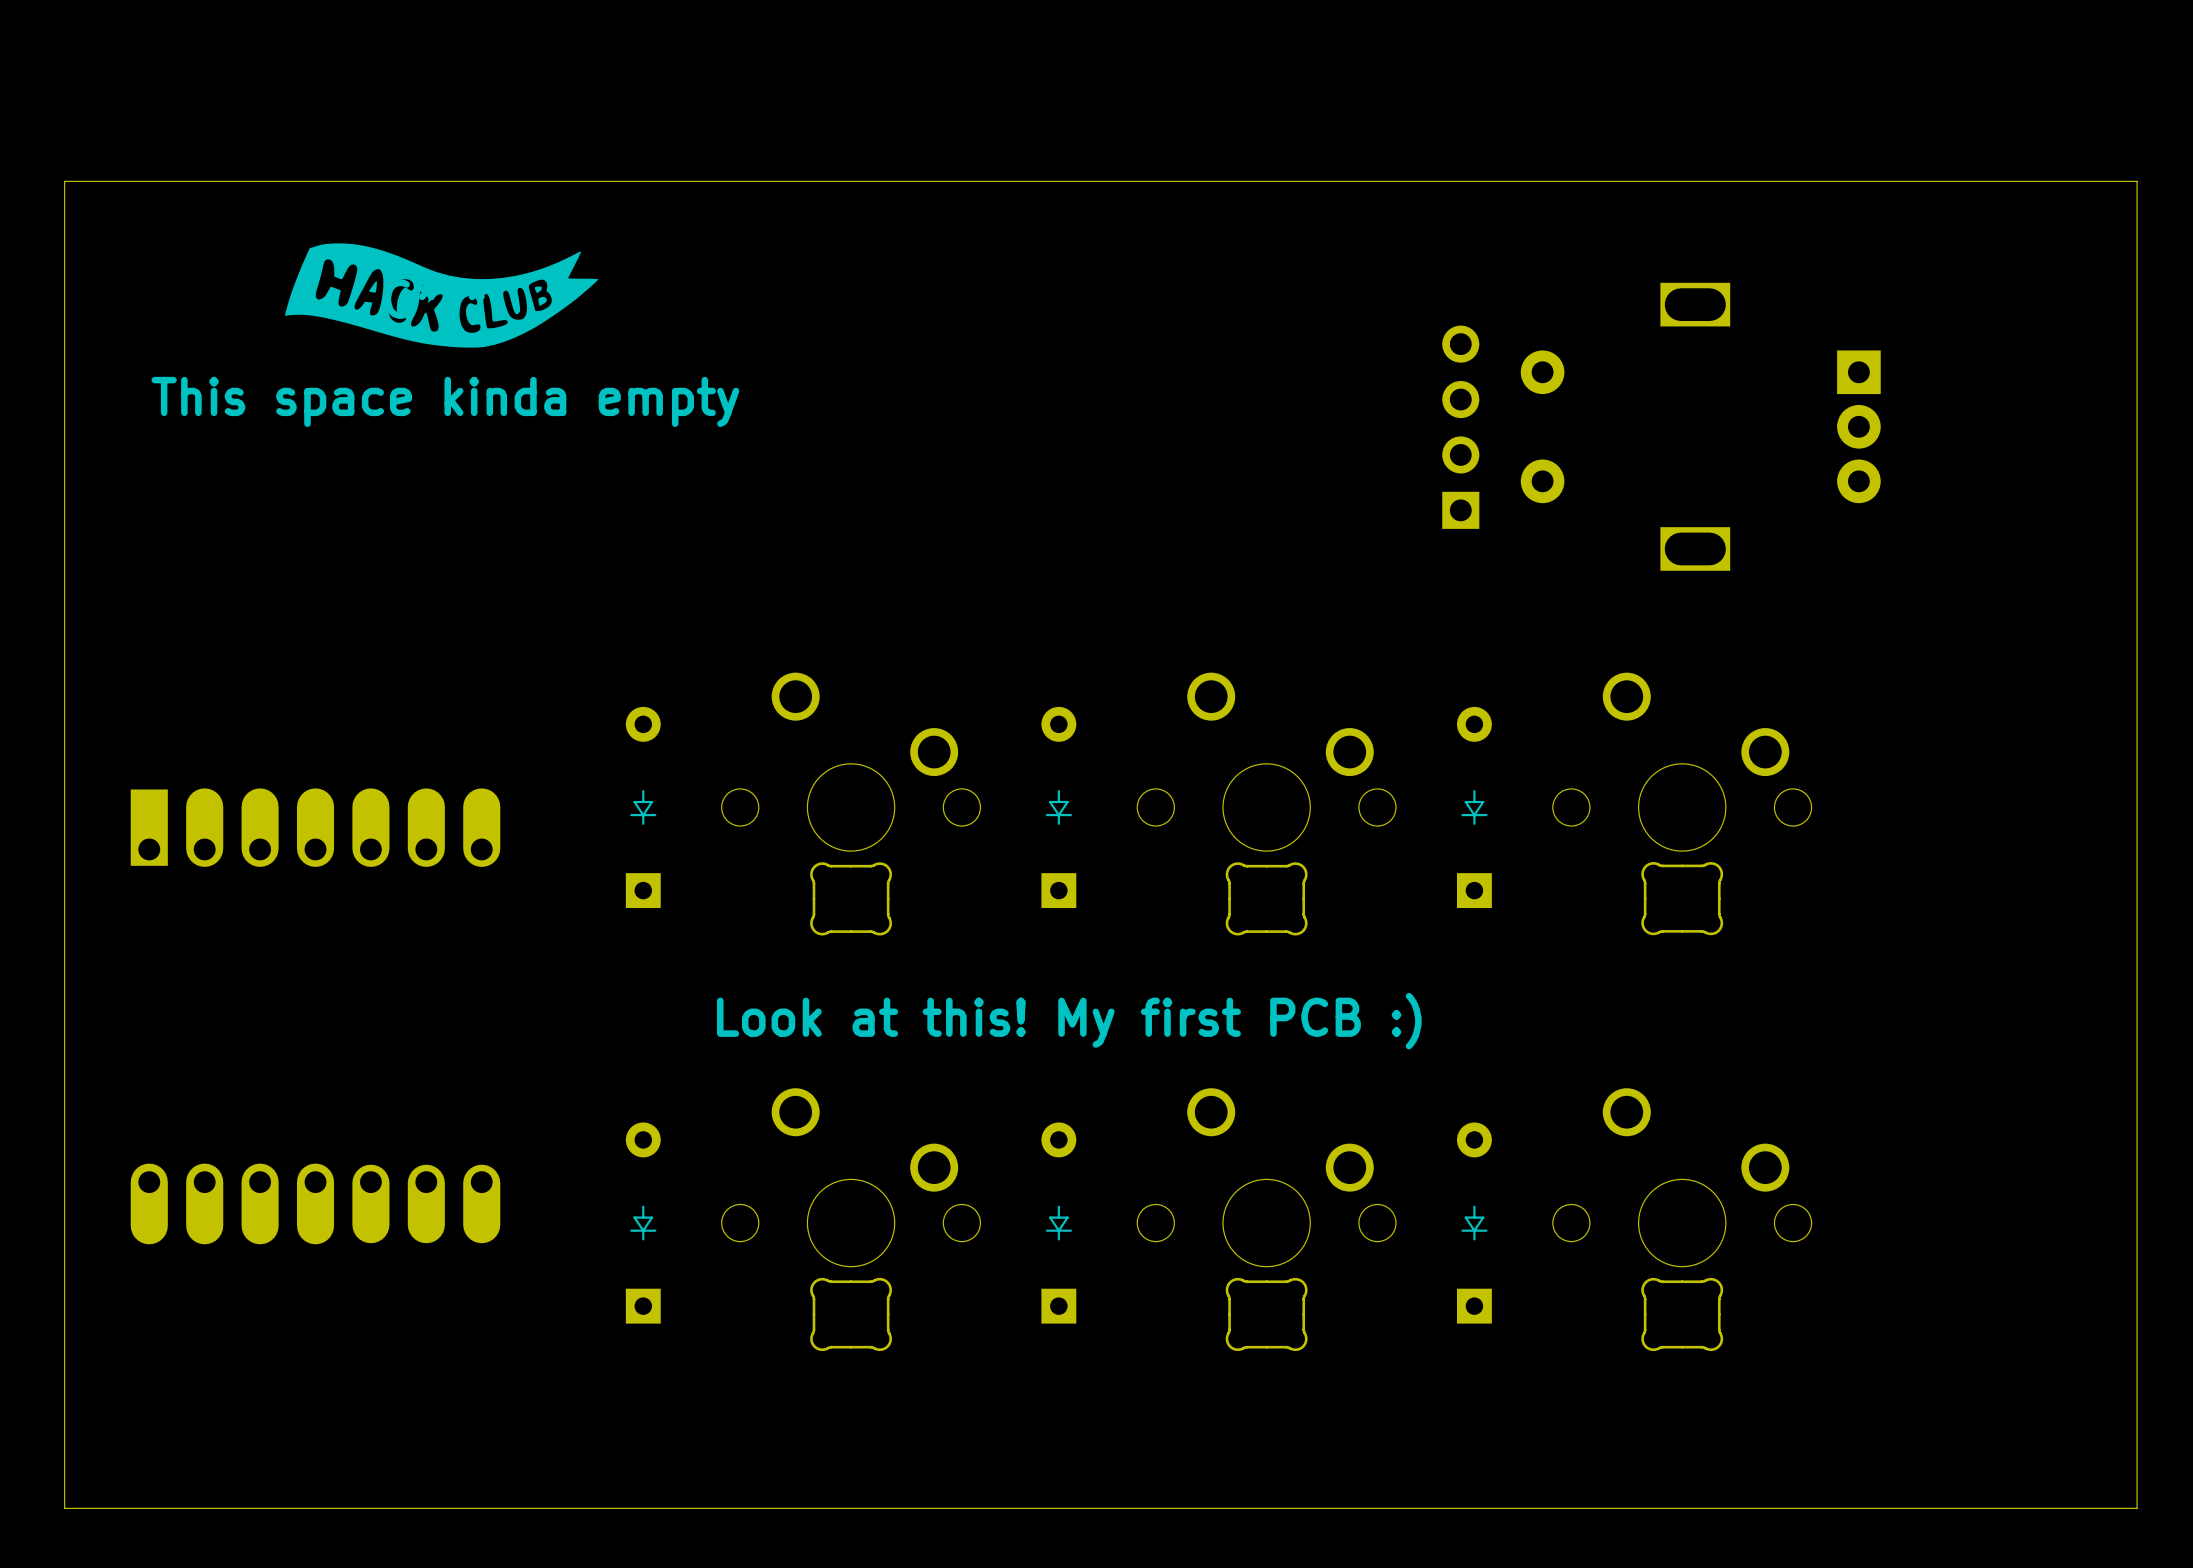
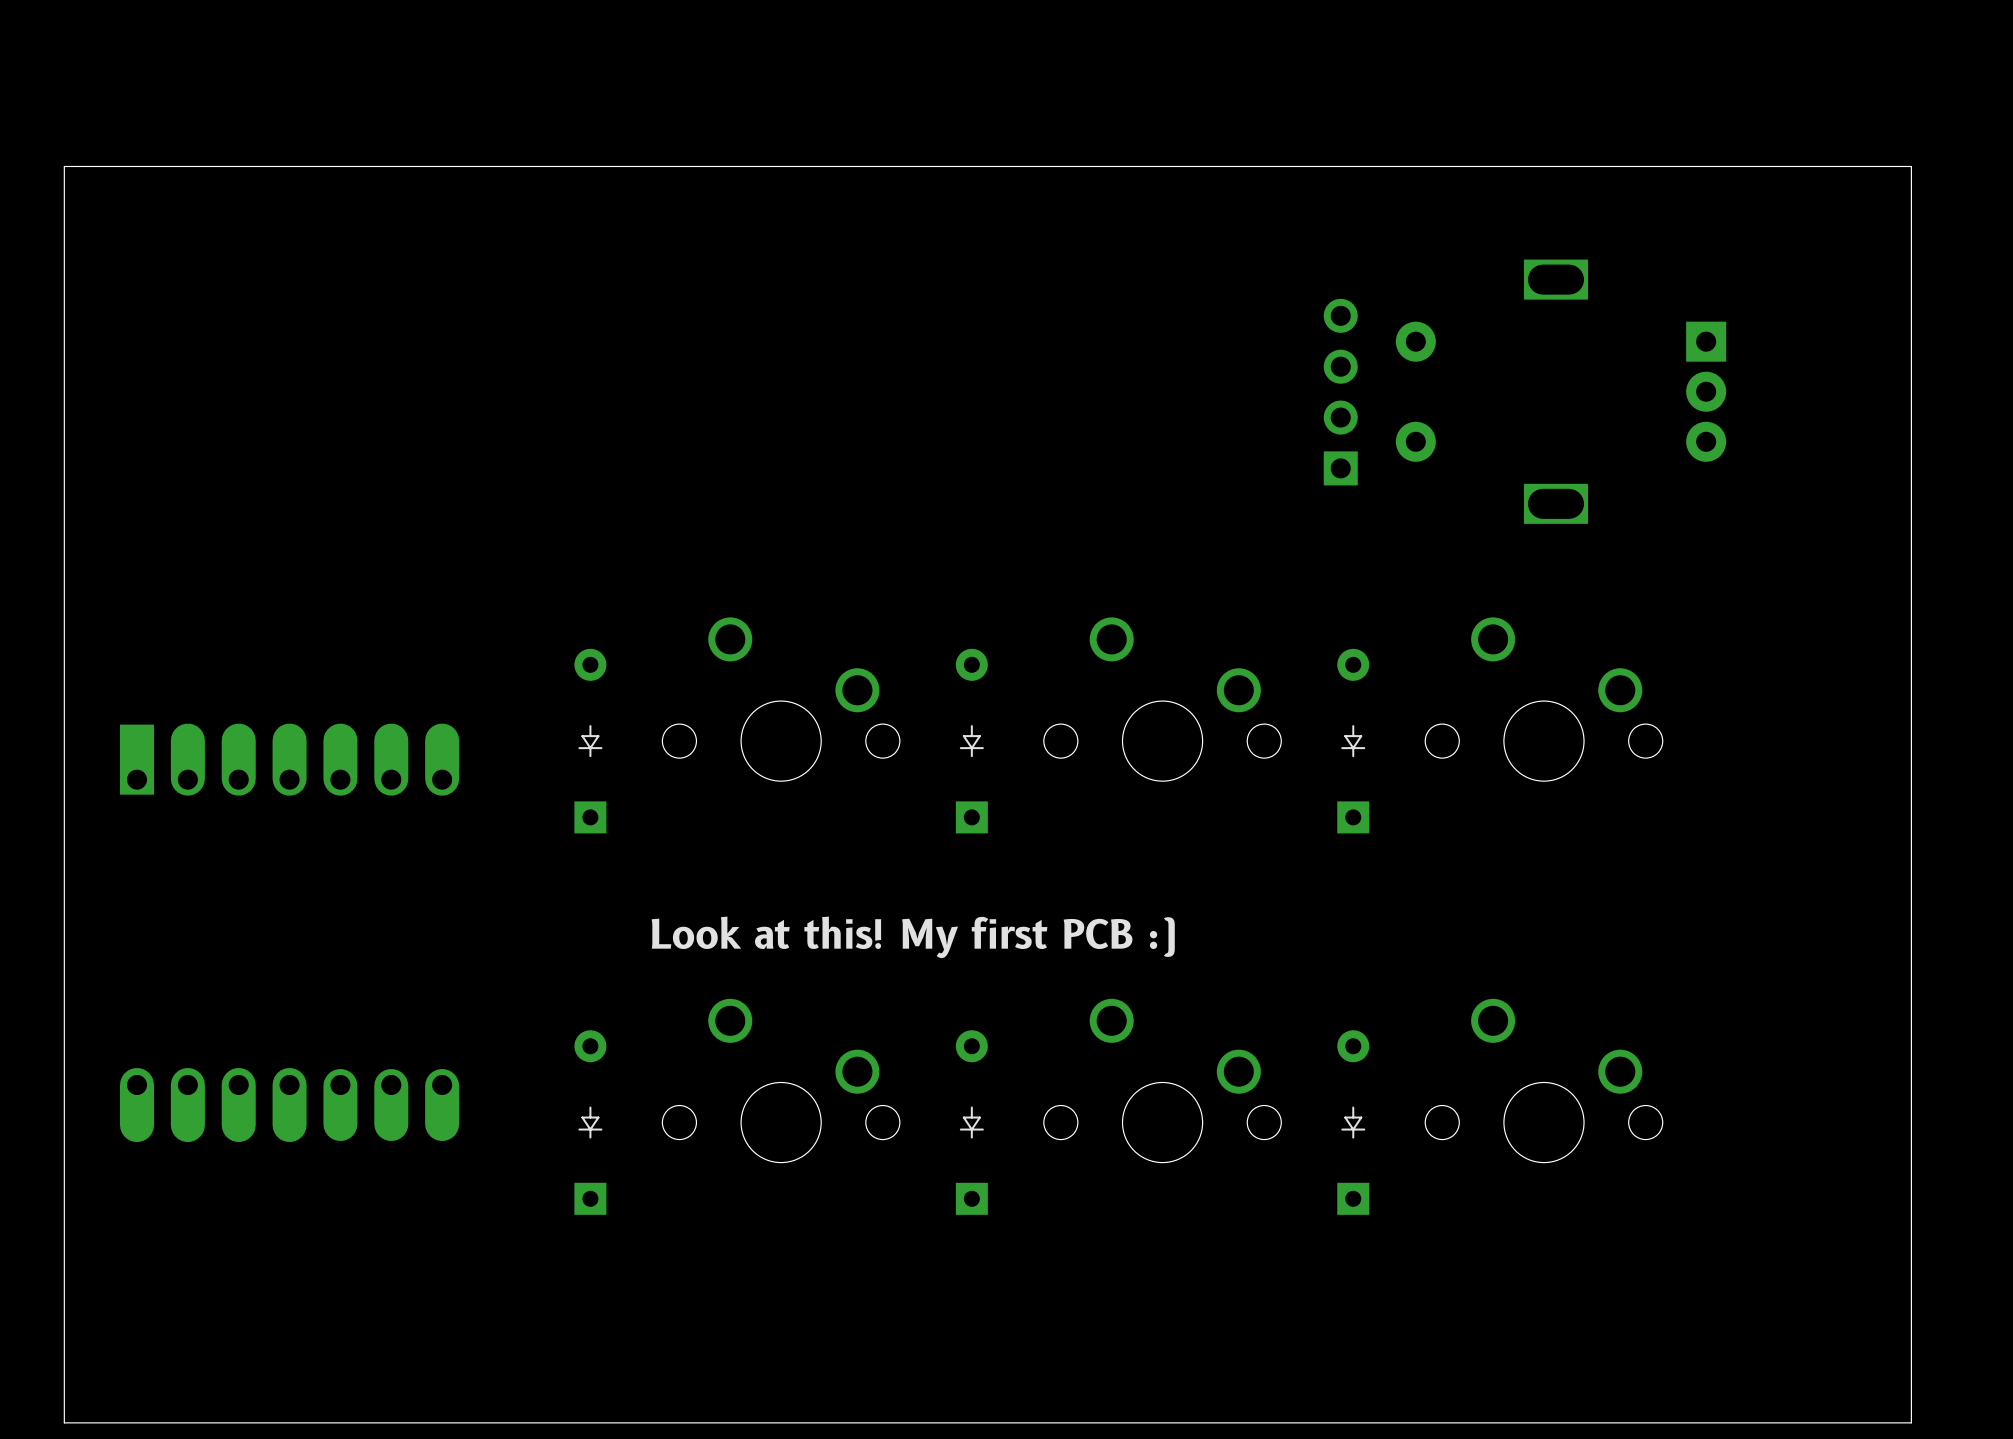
board edge: (2082, 181) (2137, 181) (2137, 1508) (64, 1508) (64, 181) (70, 181) -> (1911, 166) (1911, 1422) (64, 1422) (64, 166)
part: (441, 295) -> none
text: This space kinda empty (445, 401) -> none
part: (851, 898) -> none
part: (1266, 898) -> none
part: (1682, 898) -> none
part: (851, 1314) -> none
part: (1266, 1314) -> none
part: (1682, 1314) -> none

